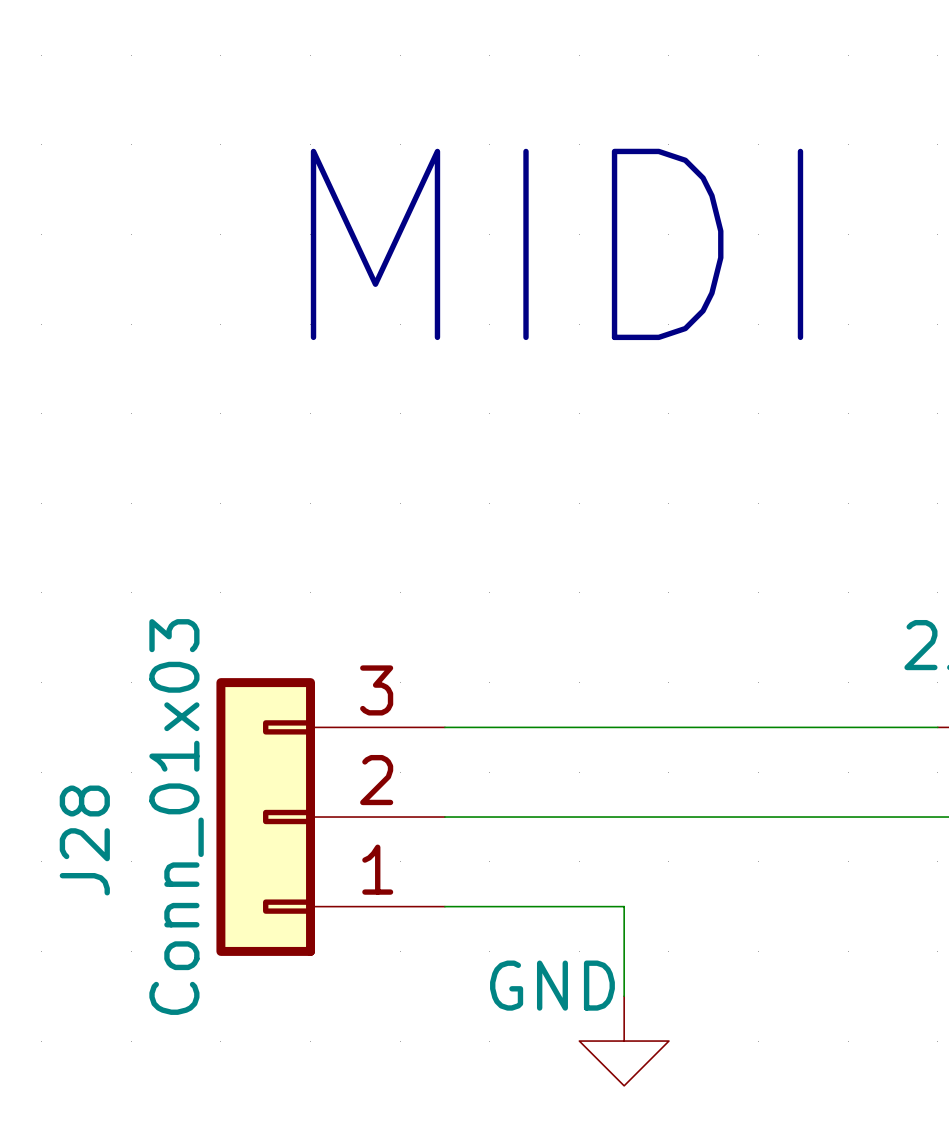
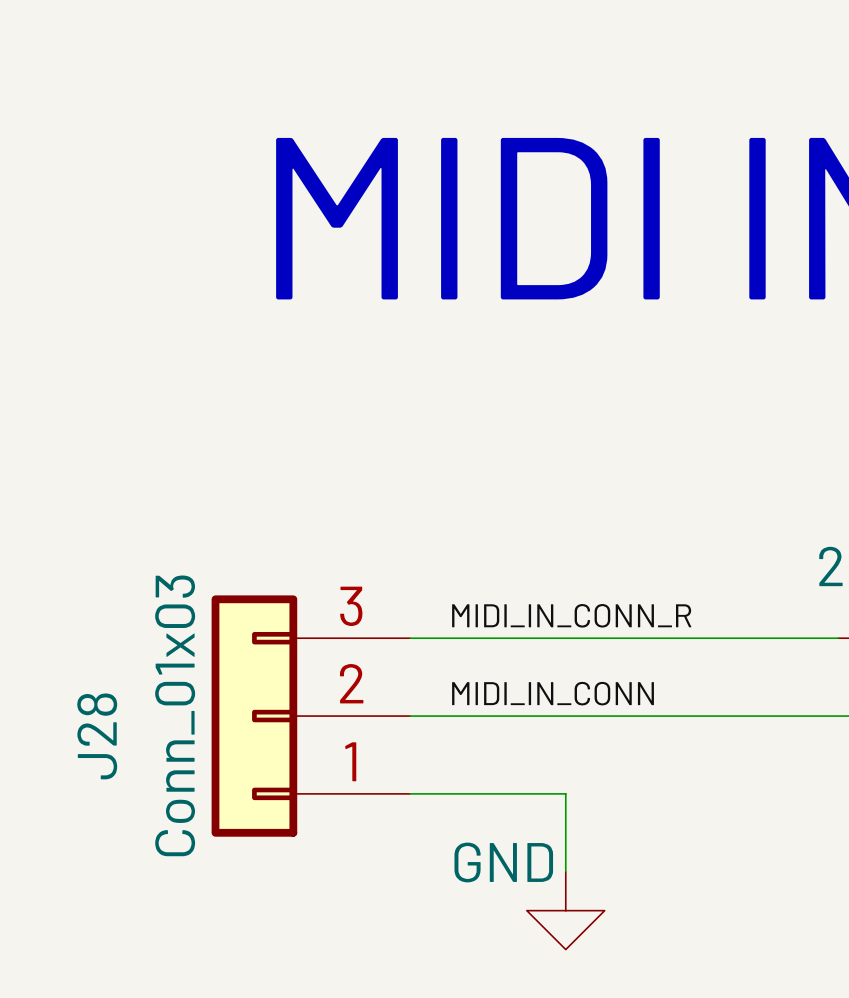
label: none -> MIDI_IN_CONN_R (571, 615)
label: none -> MIDI_IN_CONN (553, 693)

